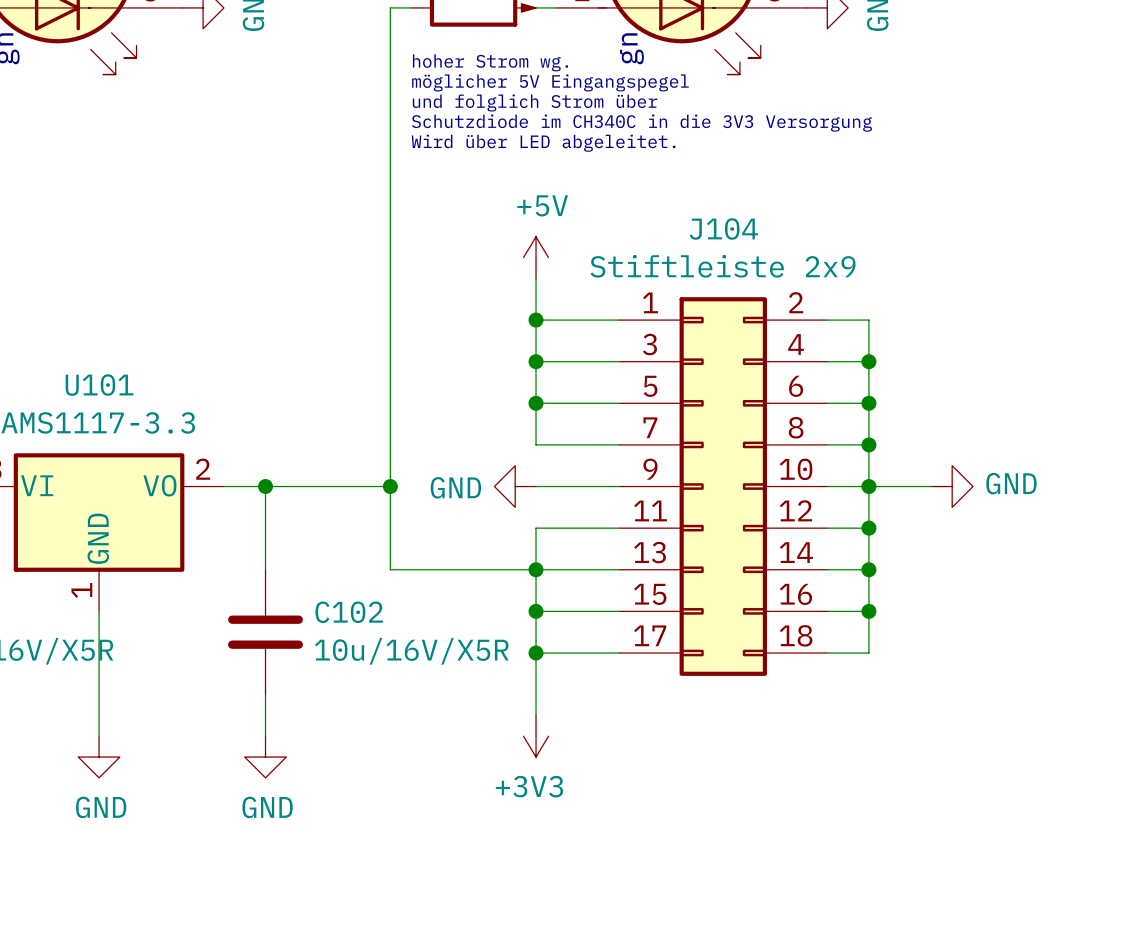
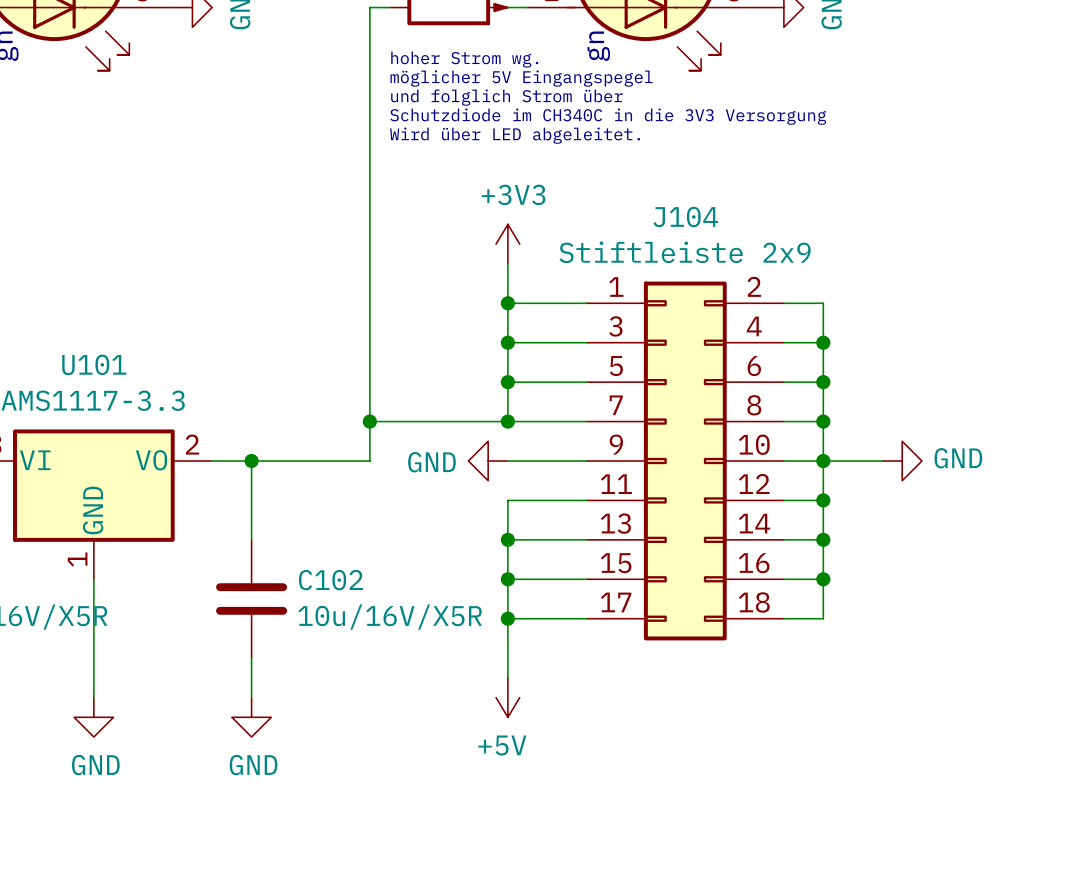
power symbol: +5V (536, 257) -> +3V3 (507, 244)
wire: none -> (369, 421) (507, 421)
junction: none -> (507, 421)
wire: (390, 486) (390, 569) (536, 569) -> none
junction position: (390, 486) -> (369, 421)
power symbol: +3V3 (536, 736) -> +5V (507, 697)

